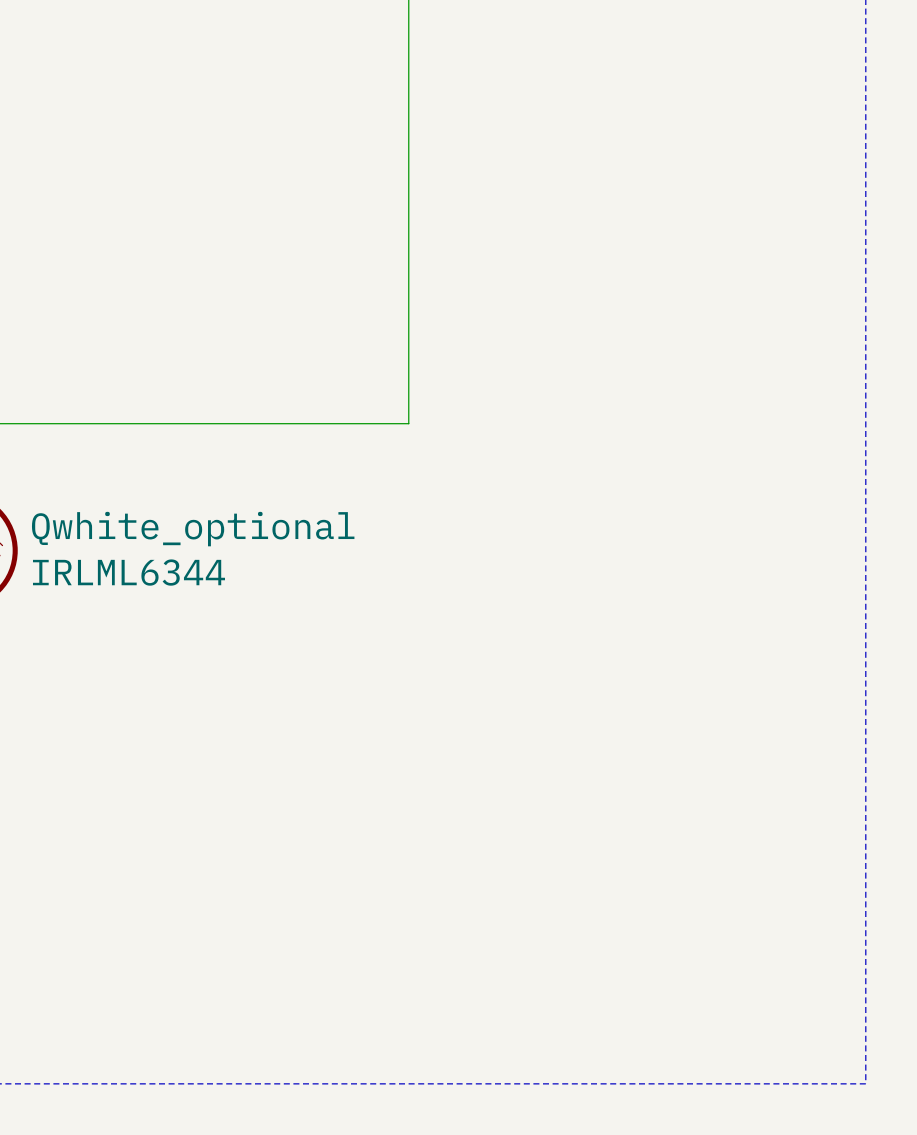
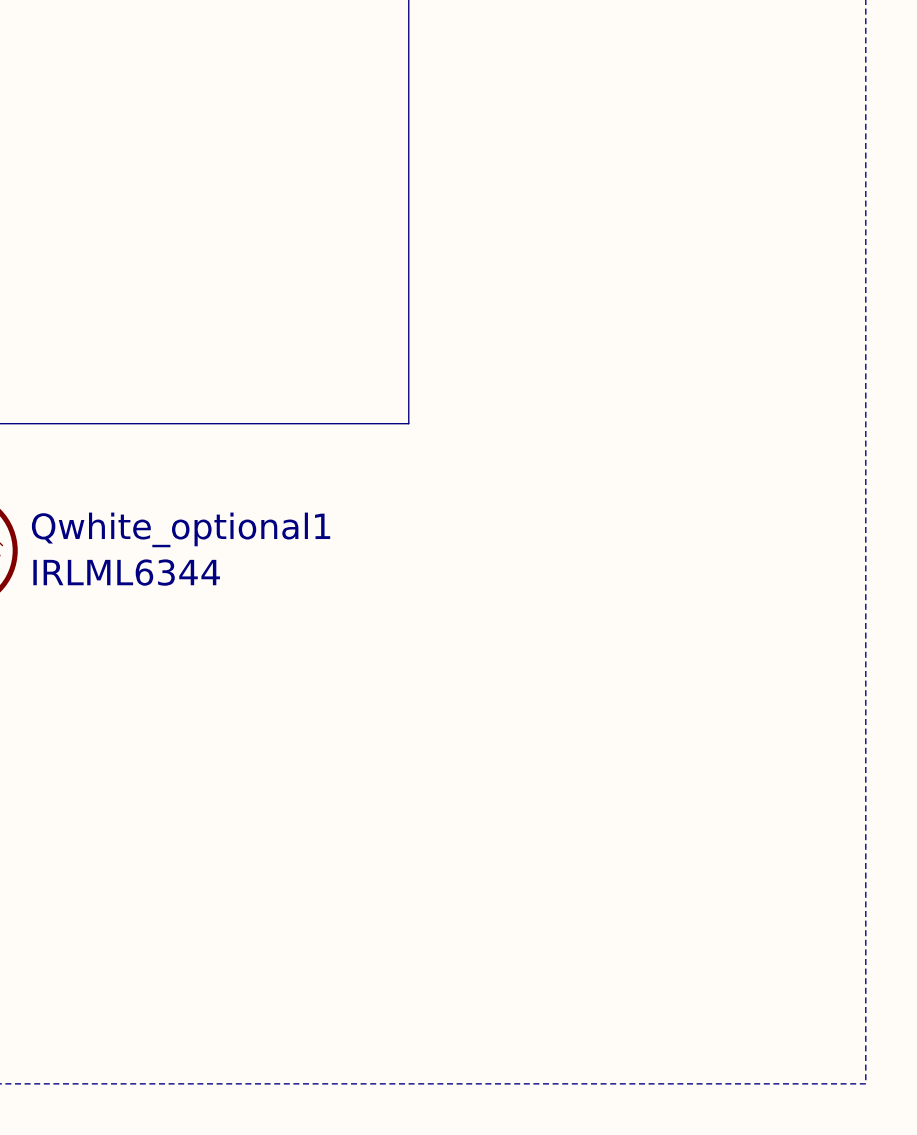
Qwhite_optional name: Qwhite_optional (193, 529) -> Qwhite_optional1 (181, 529)

